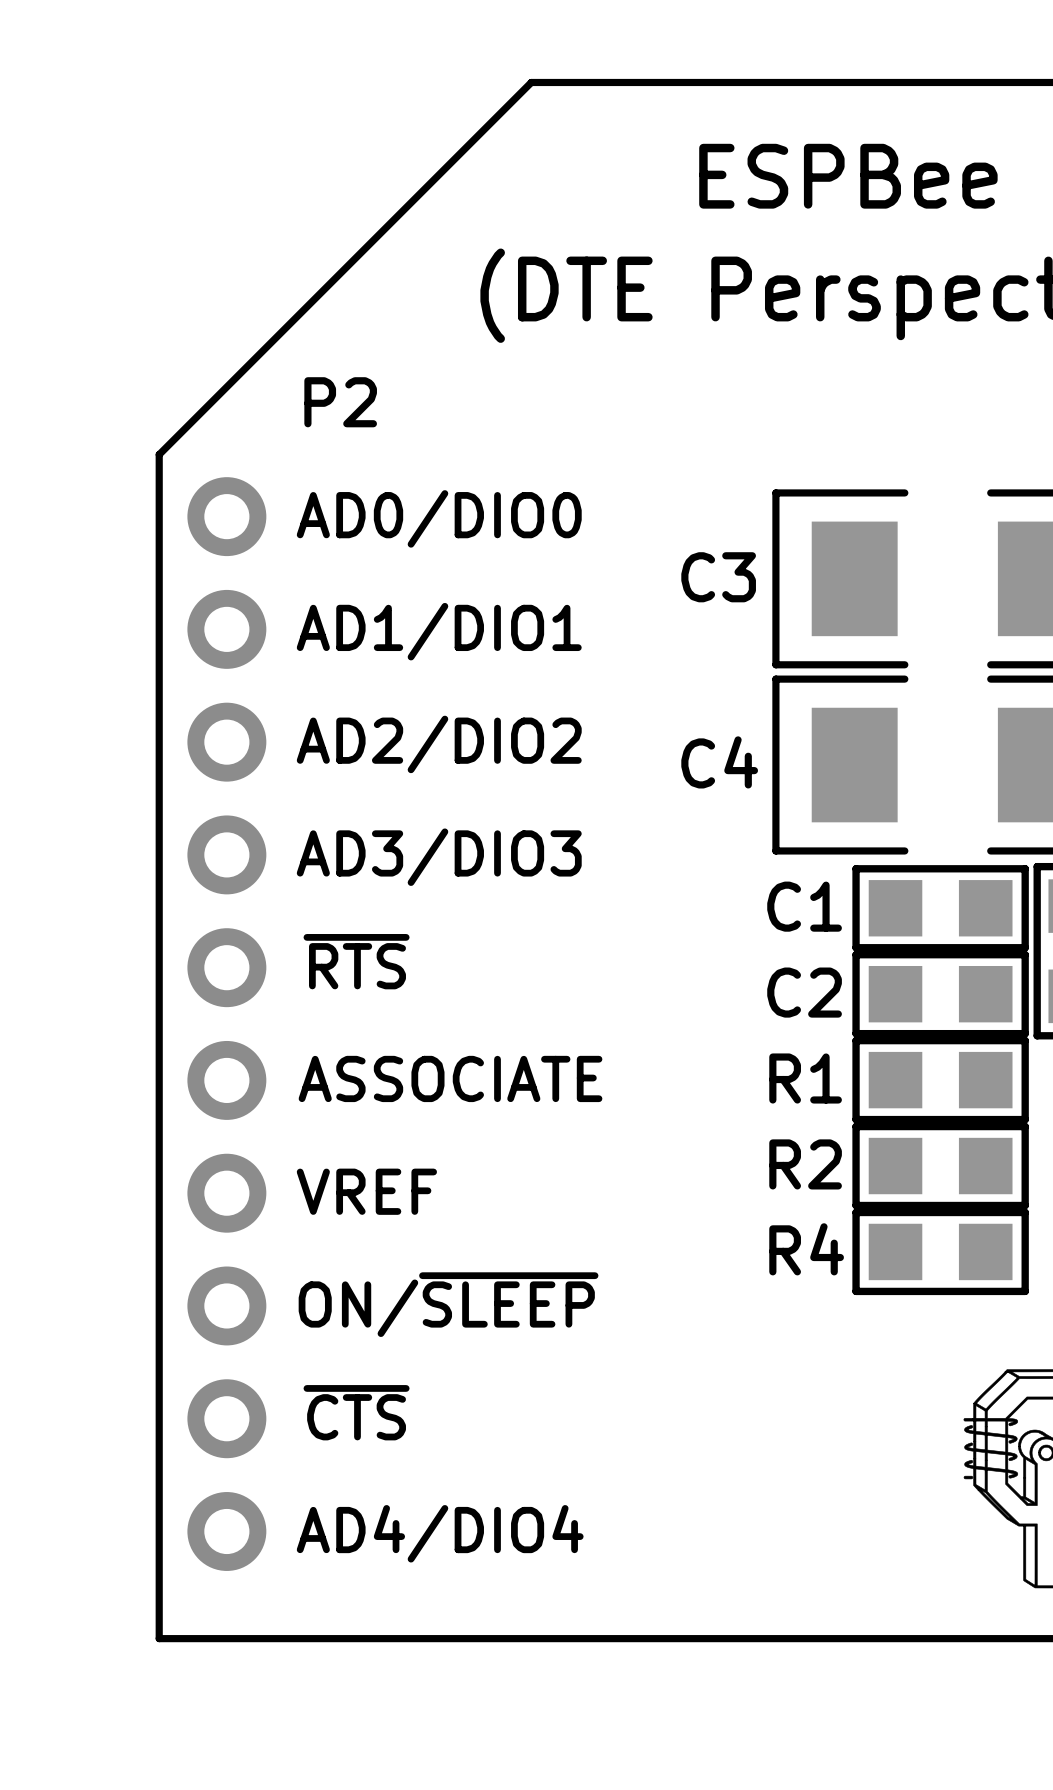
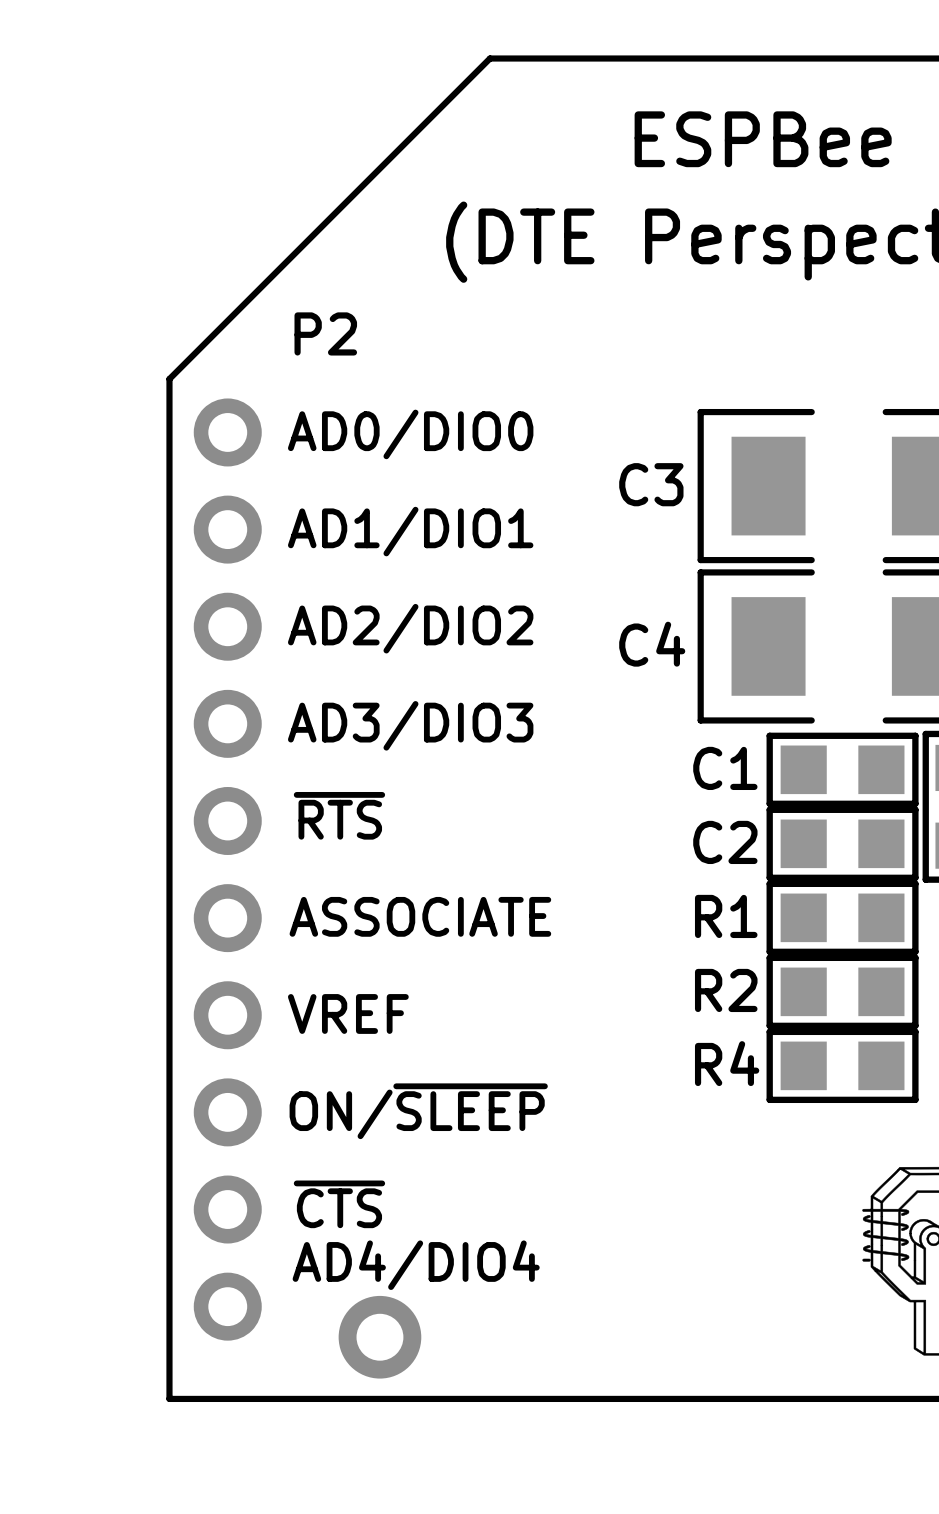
P2 text position: AD4/DIO4 (440, 1533) -> AD4/DIO4 (416, 1265)
part: none -> (379, 1337)

